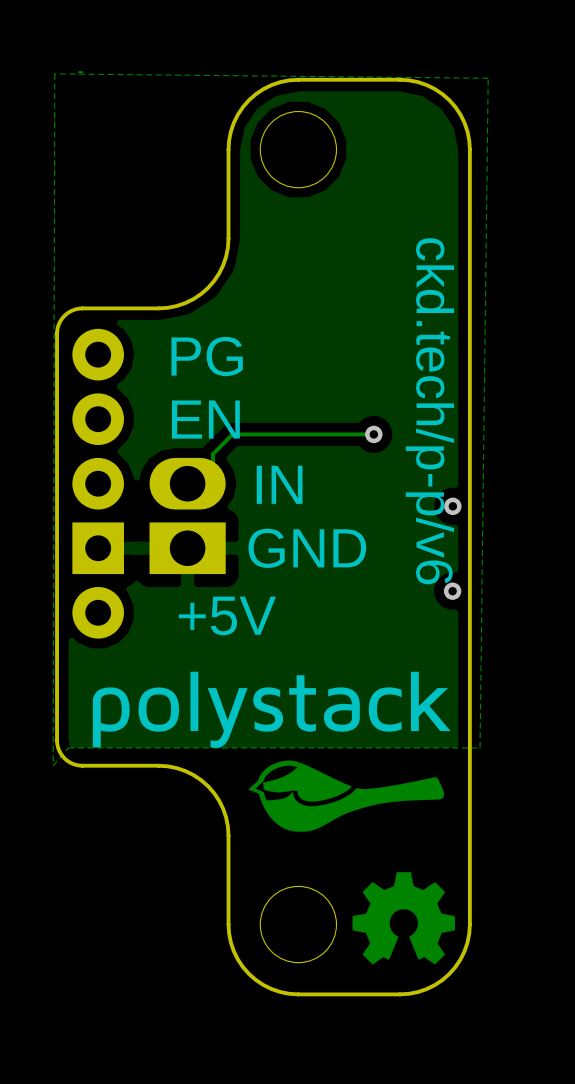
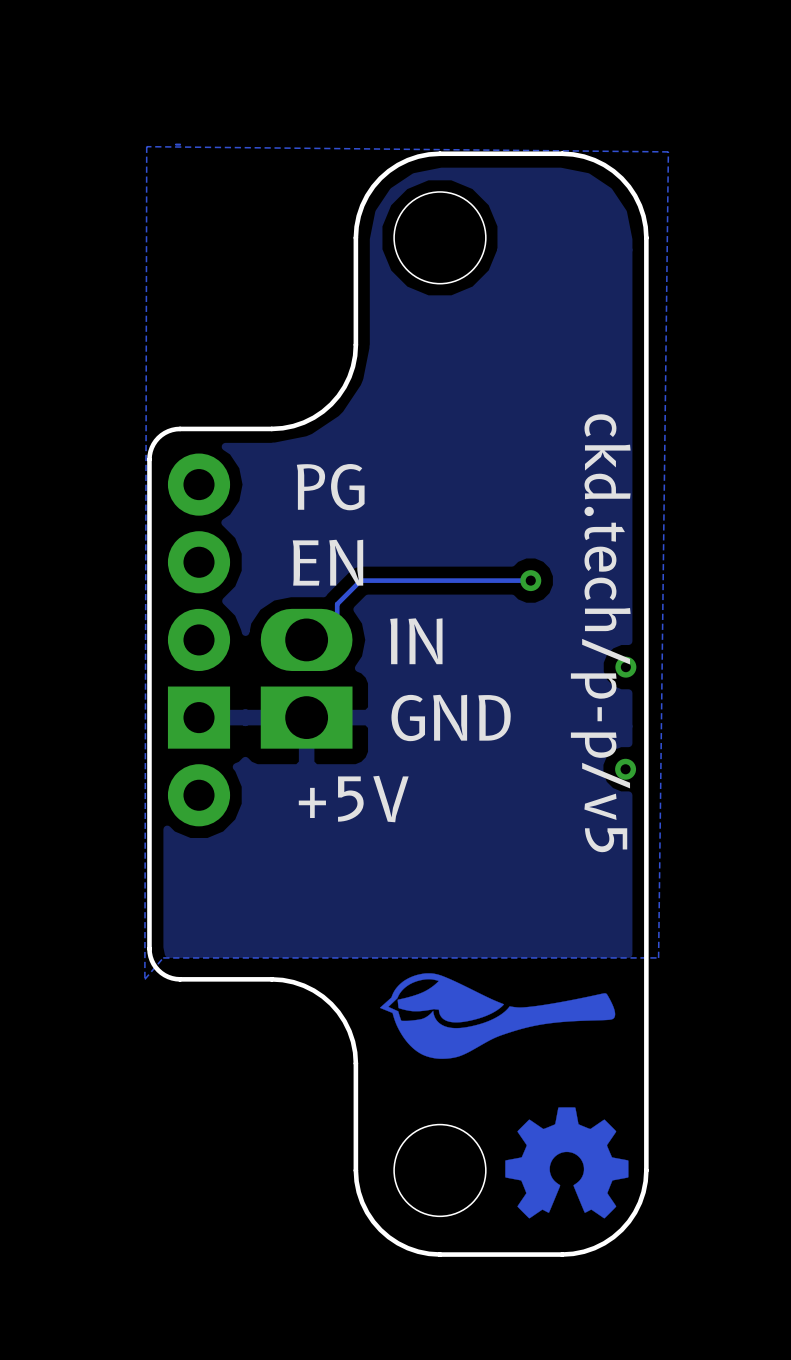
text: ckd.tech/p-p/v6 (429, 411) -> ckd.tech/p-p/v5 (600, 633)
drawing: [92, 671, 451, 748] -> none

